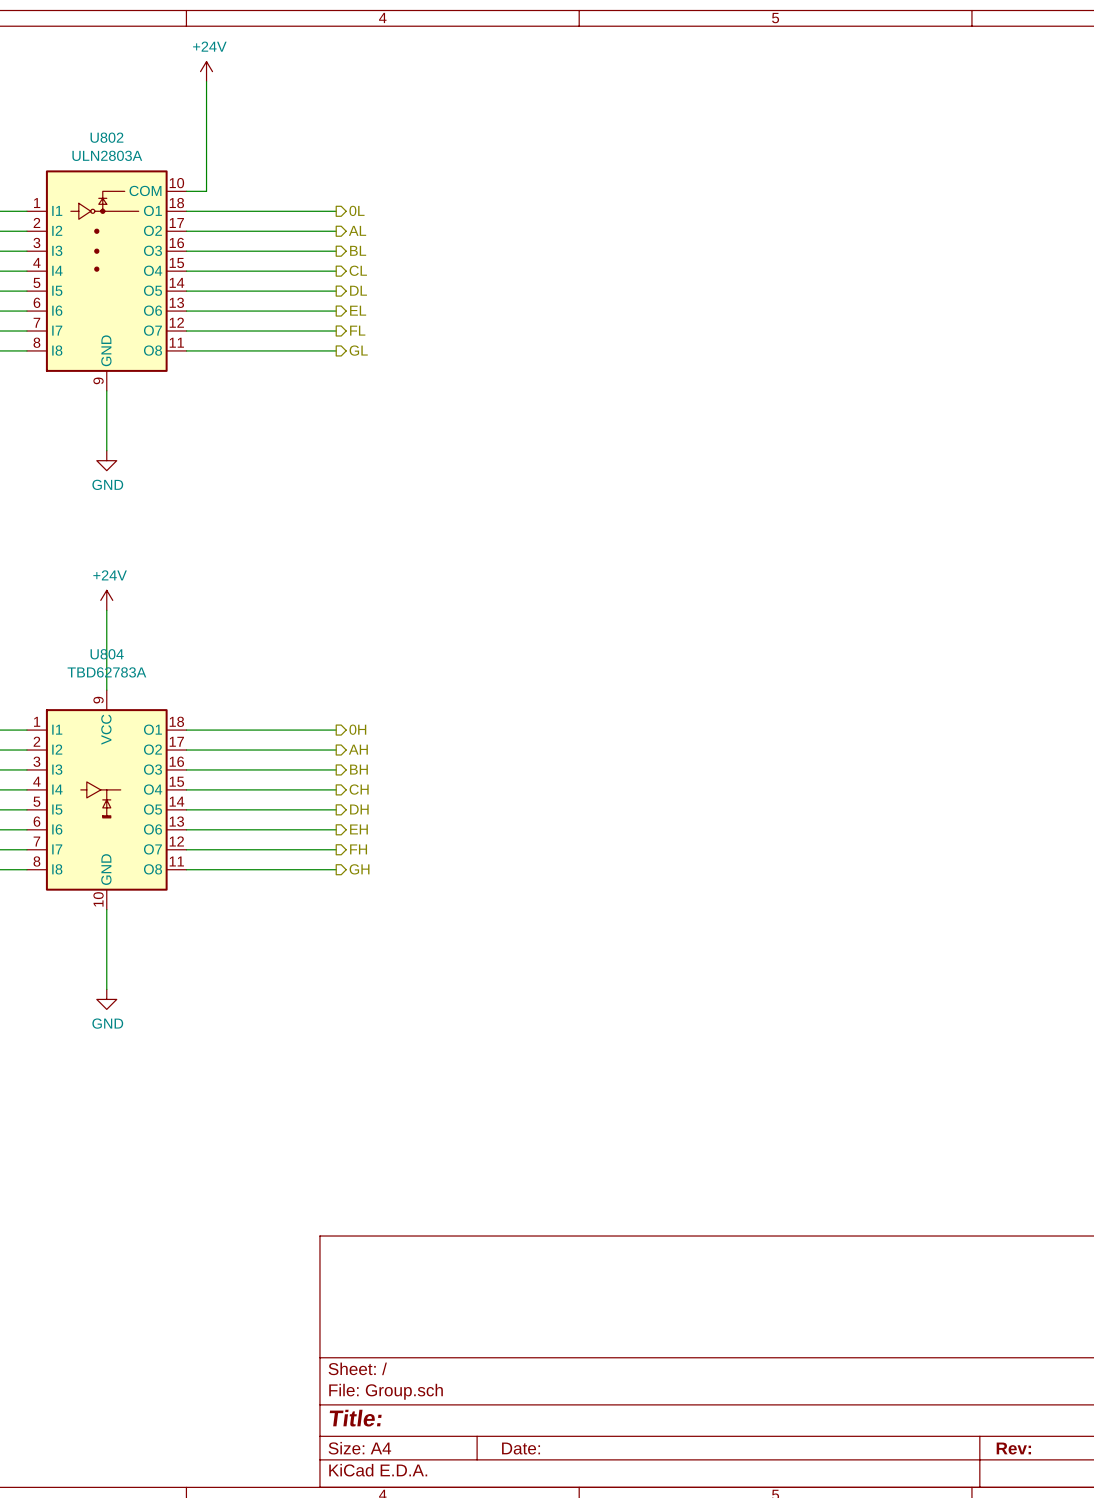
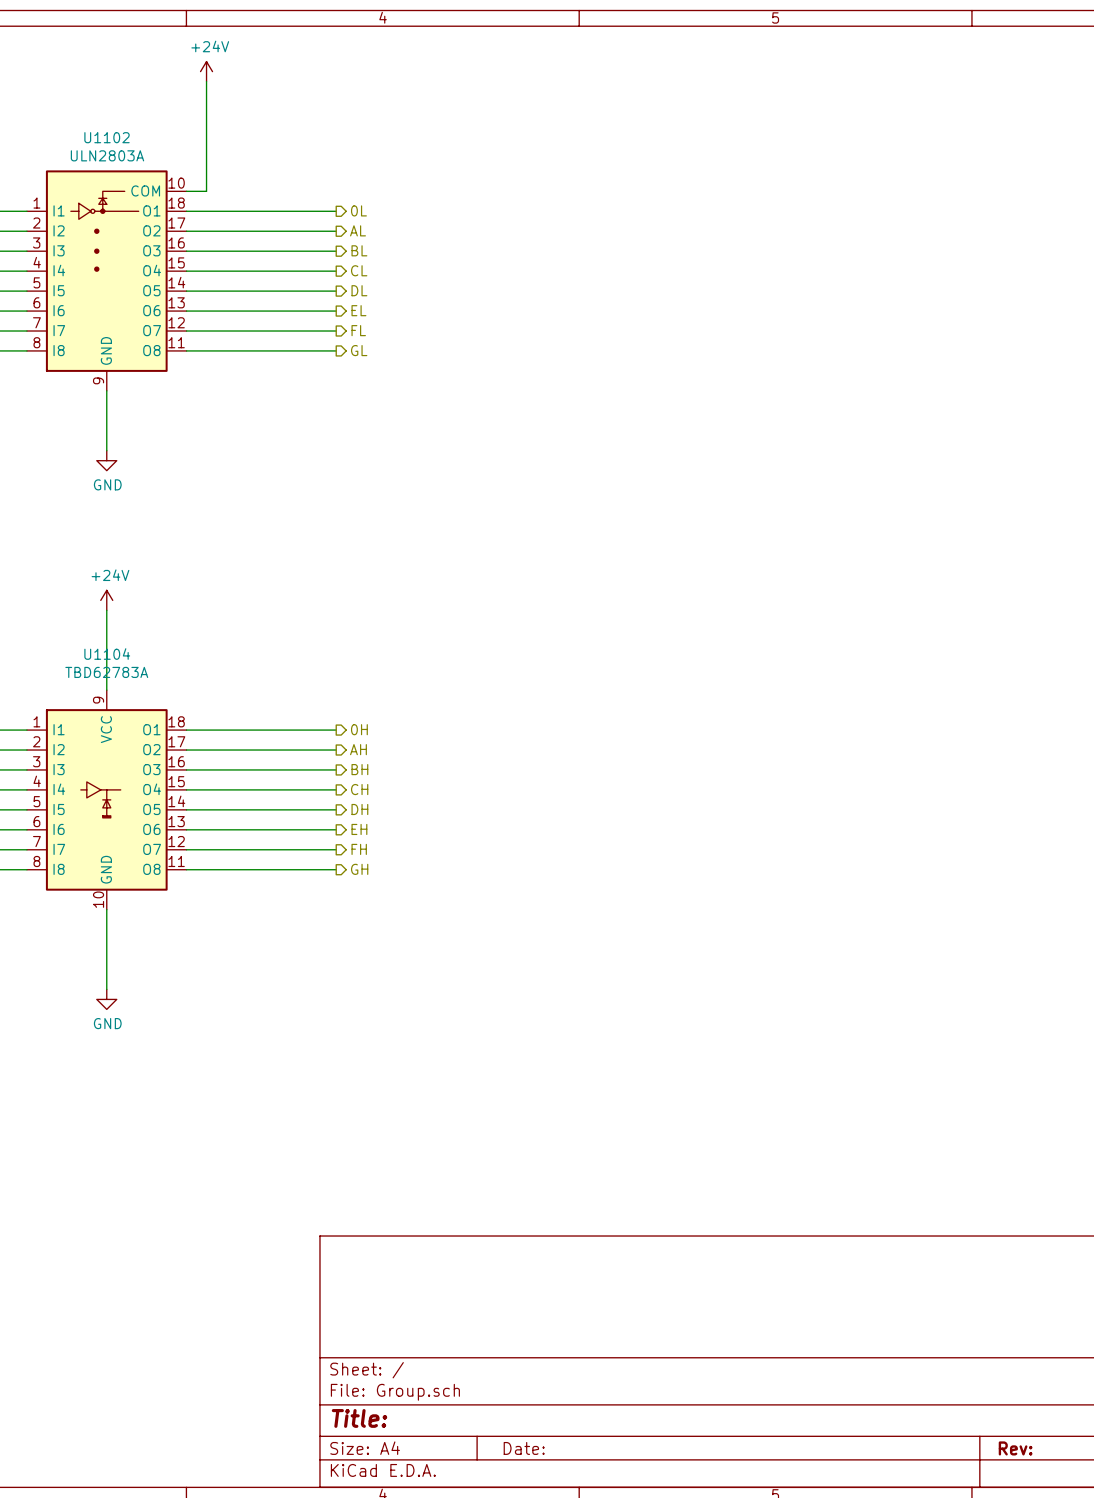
U802 name: U802 (106, 137) -> U1102 (107, 137)
U804 name: U804 (107, 654) -> U1104 (107, 654)

